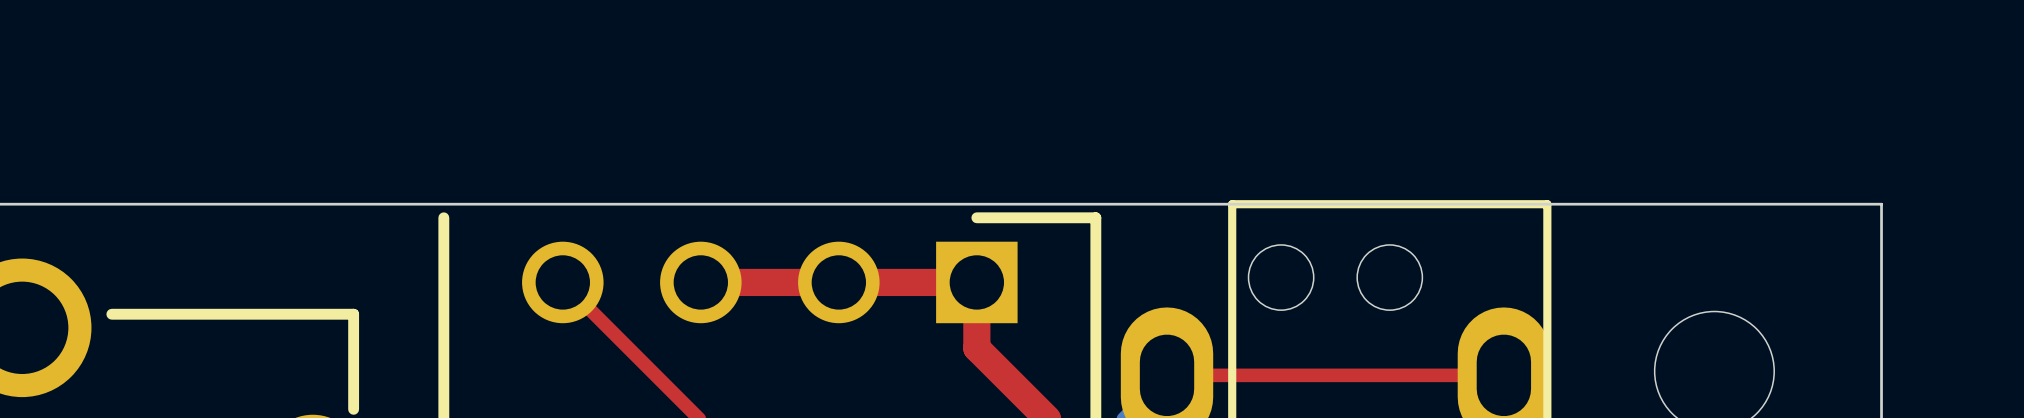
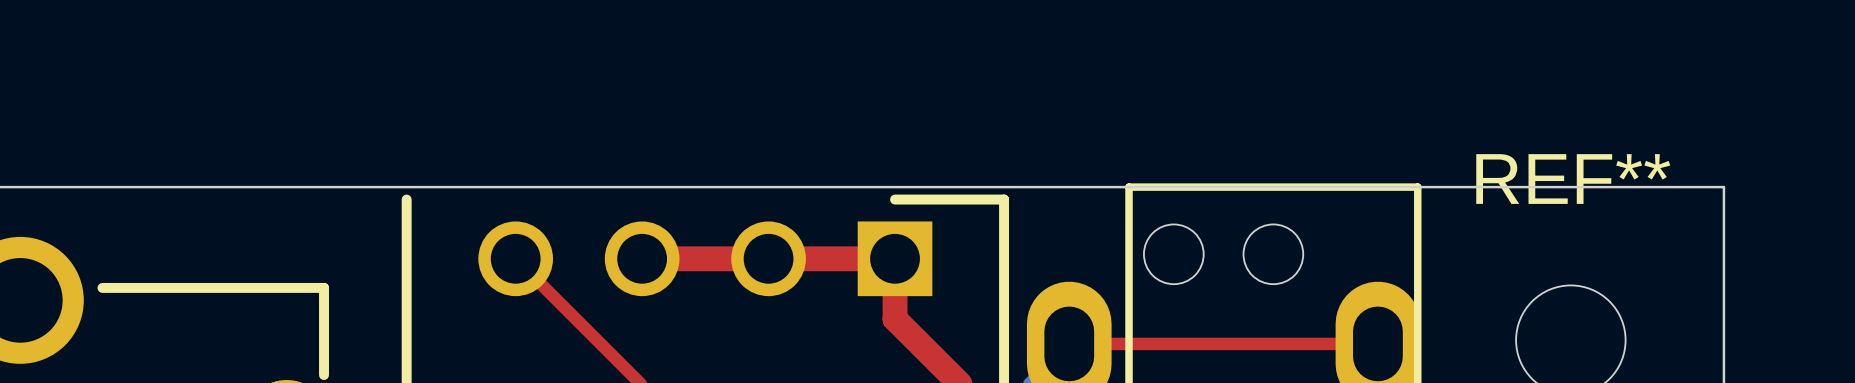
REF** name: none -> REF** (1573, 179)

